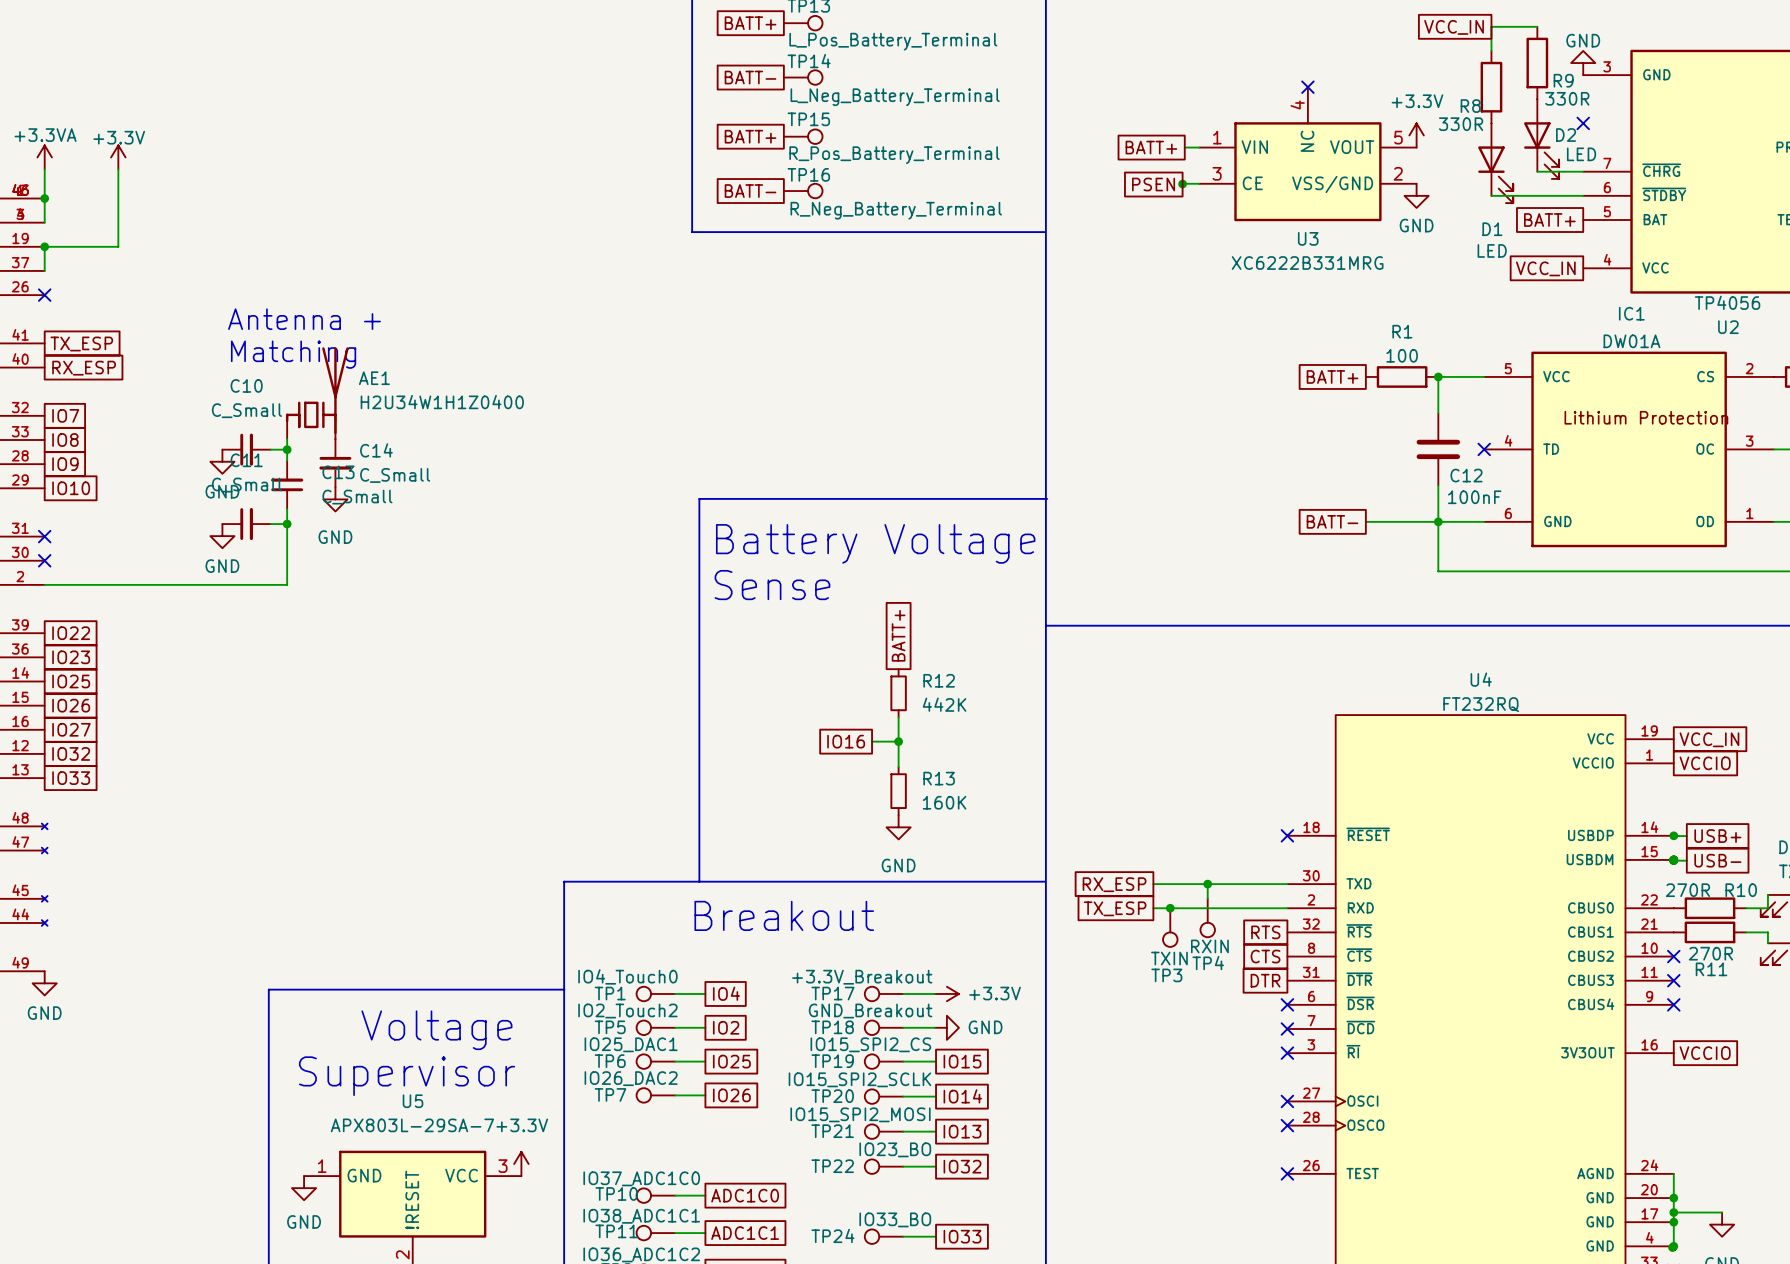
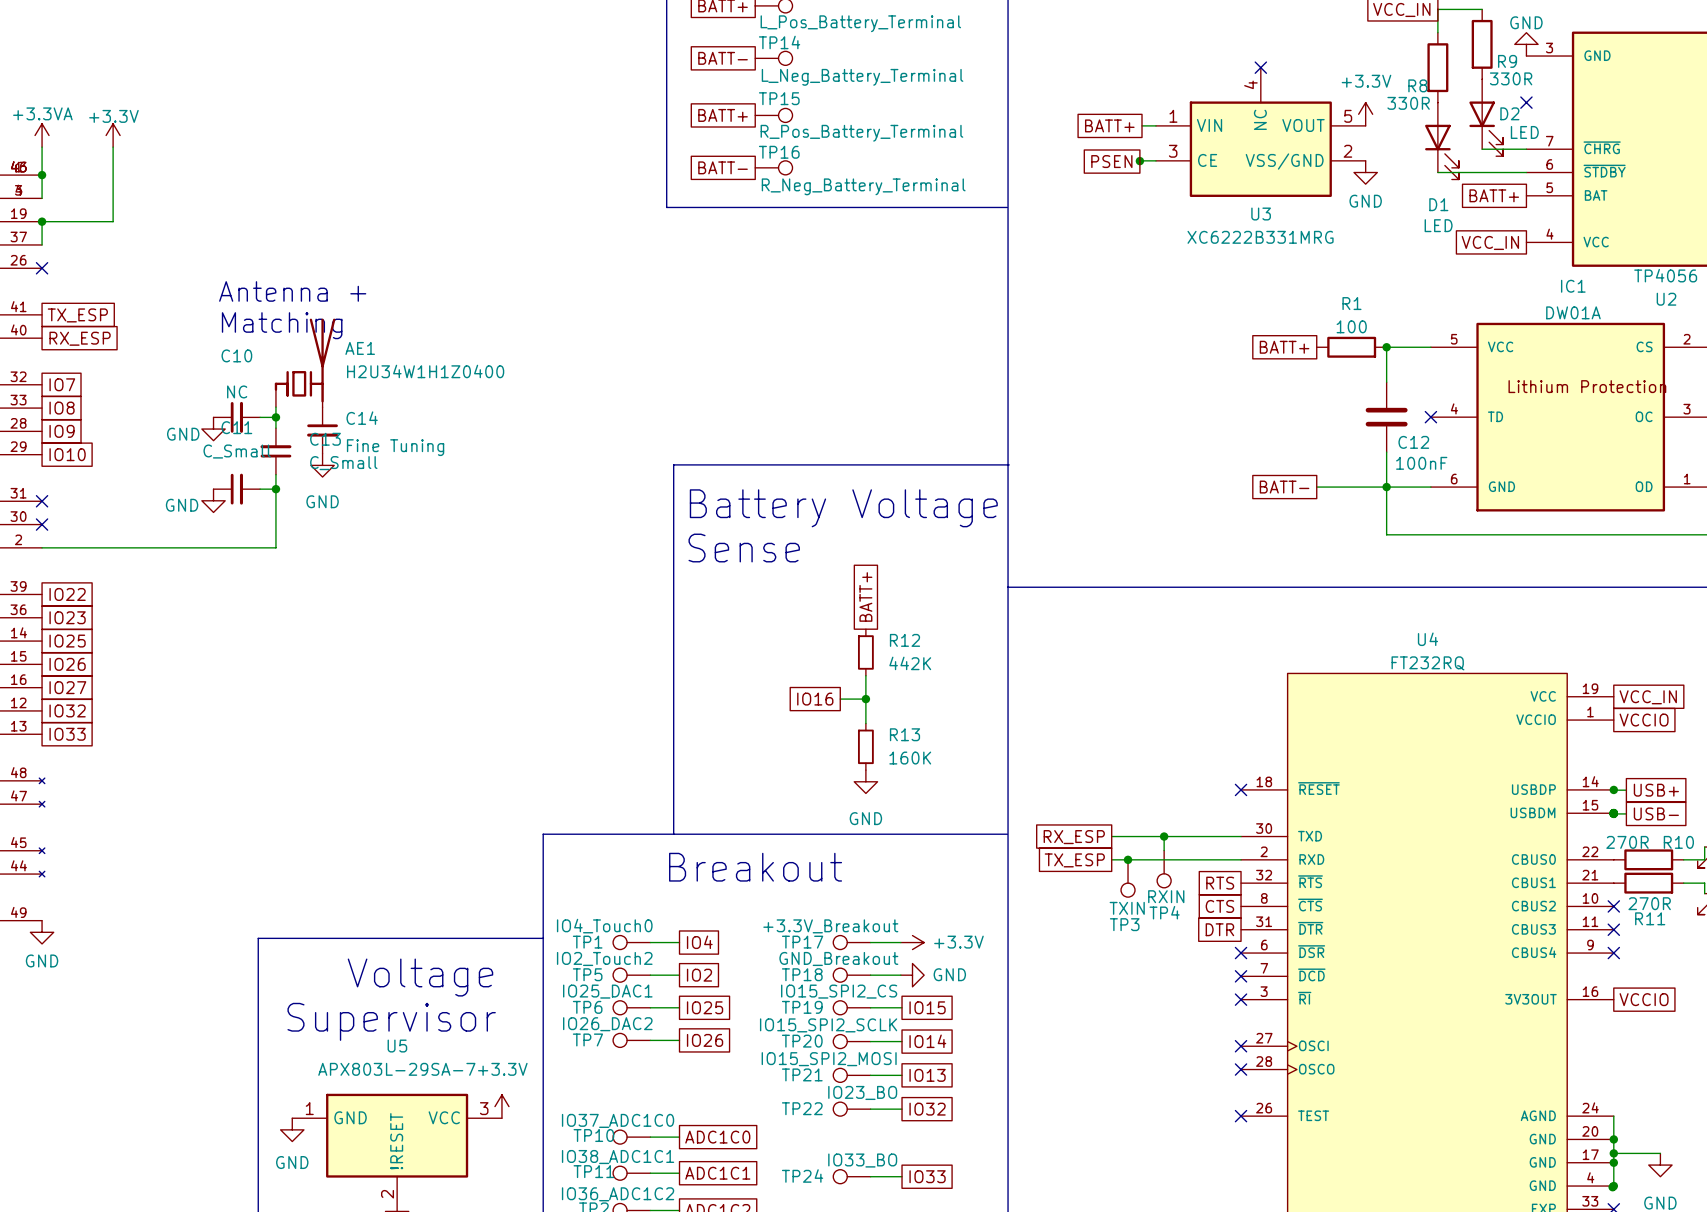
C10 value: C_Small (246, 410) -> NC (237, 391)
C14 value: C_Small (395, 475) -> Fine Tuning (395, 447)
power symbol text position: GND (222, 491) -> GND (183, 434)
power symbol text position: GND (222, 566) -> GND (182, 505)

